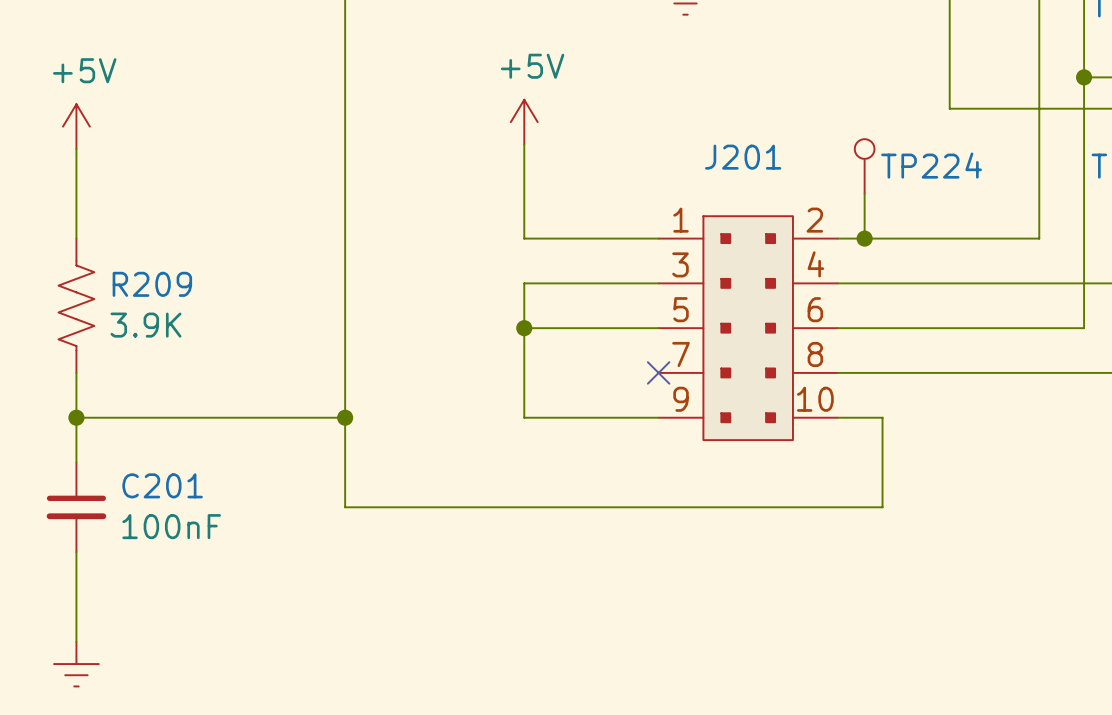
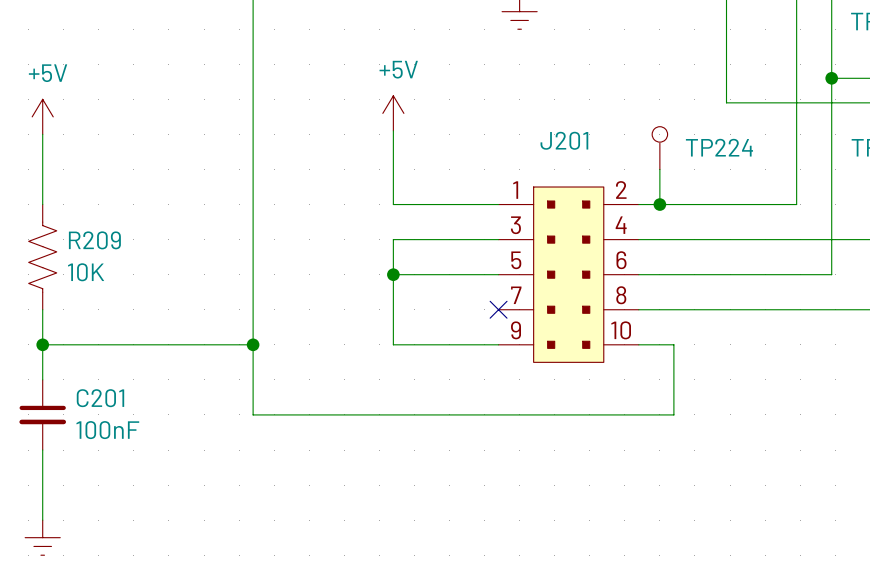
R209 value: 3.9K (145, 325) -> 10K (86, 272)

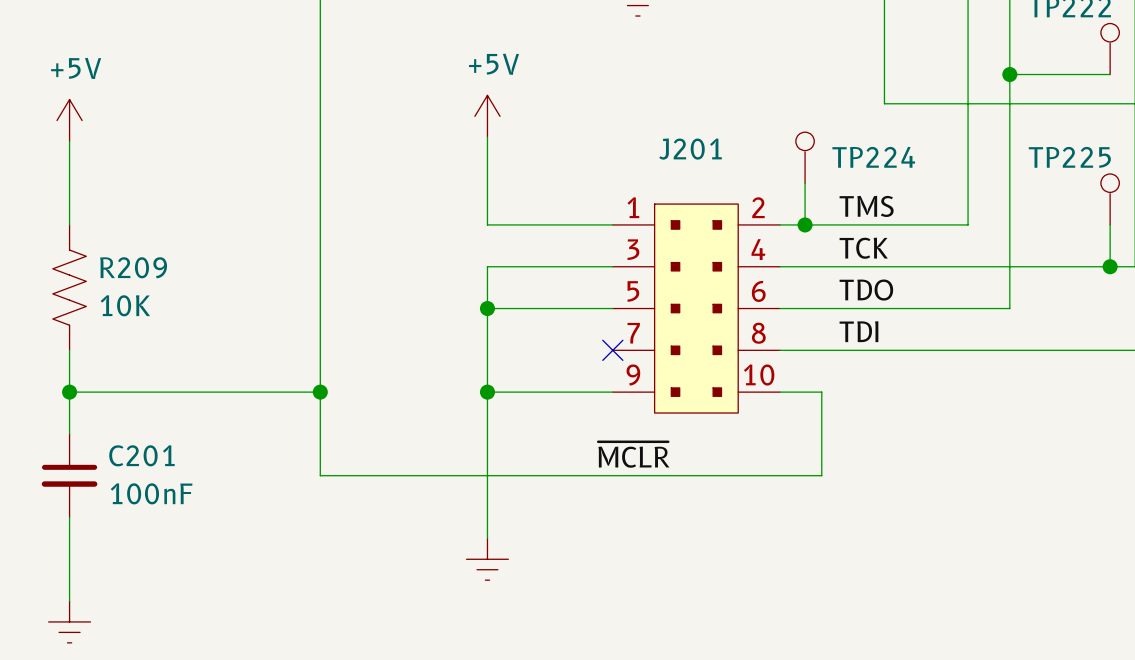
label: none -> TMS (866, 206)
label: none -> TCK (863, 248)
label: none -> TDO (866, 290)
label: none -> TDI (858, 331)
wire: none -> (487, 392) (487, 538)
junction: none -> (487, 392)
label: none -> ~{MCLR} (633, 454)
power symbol: none -> (487, 559)

